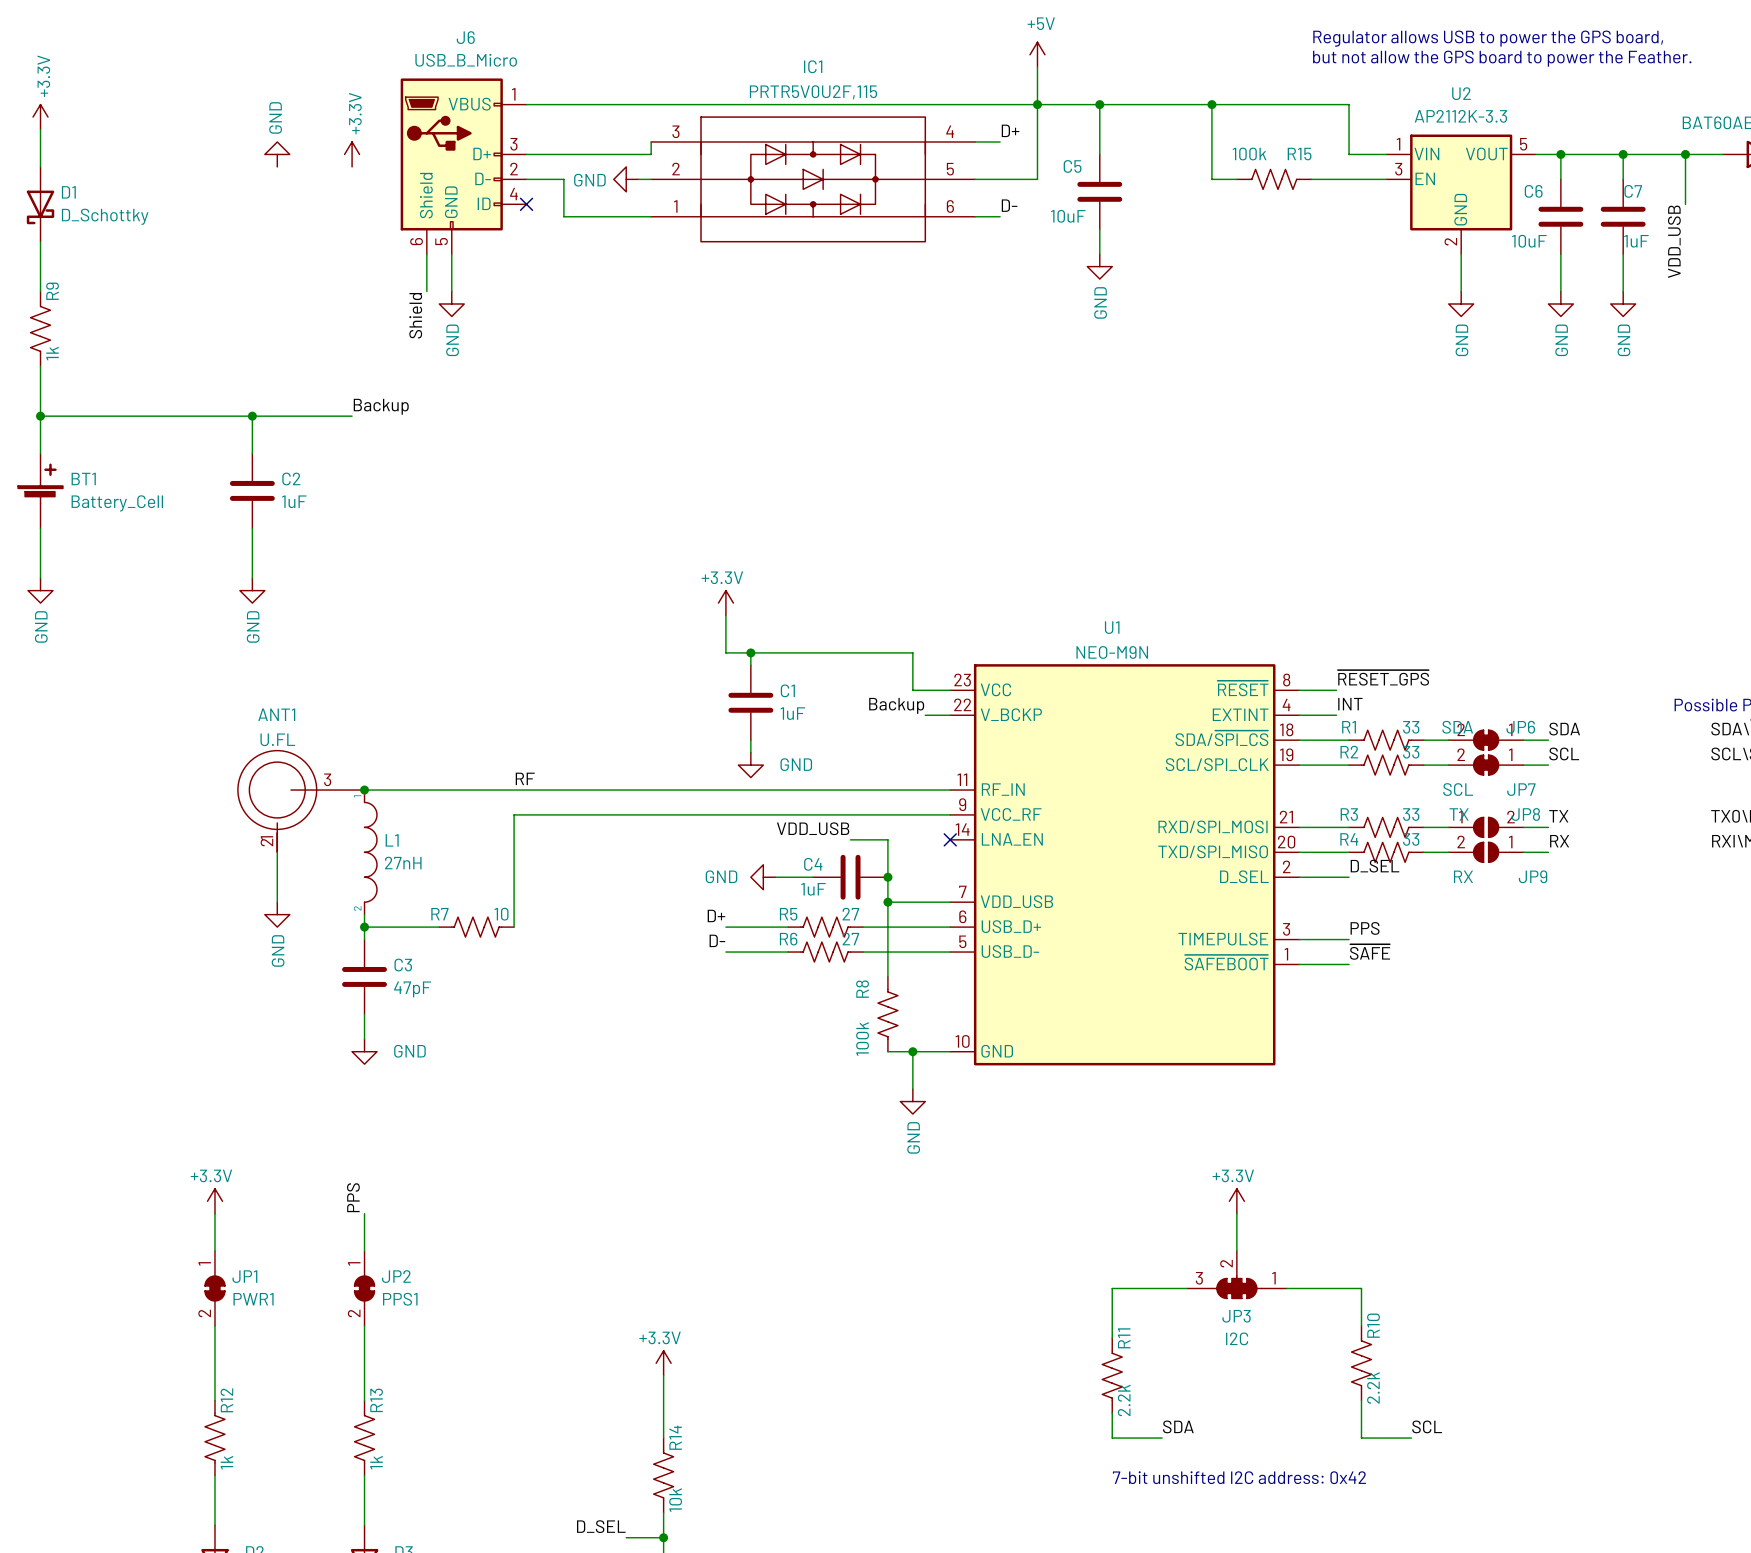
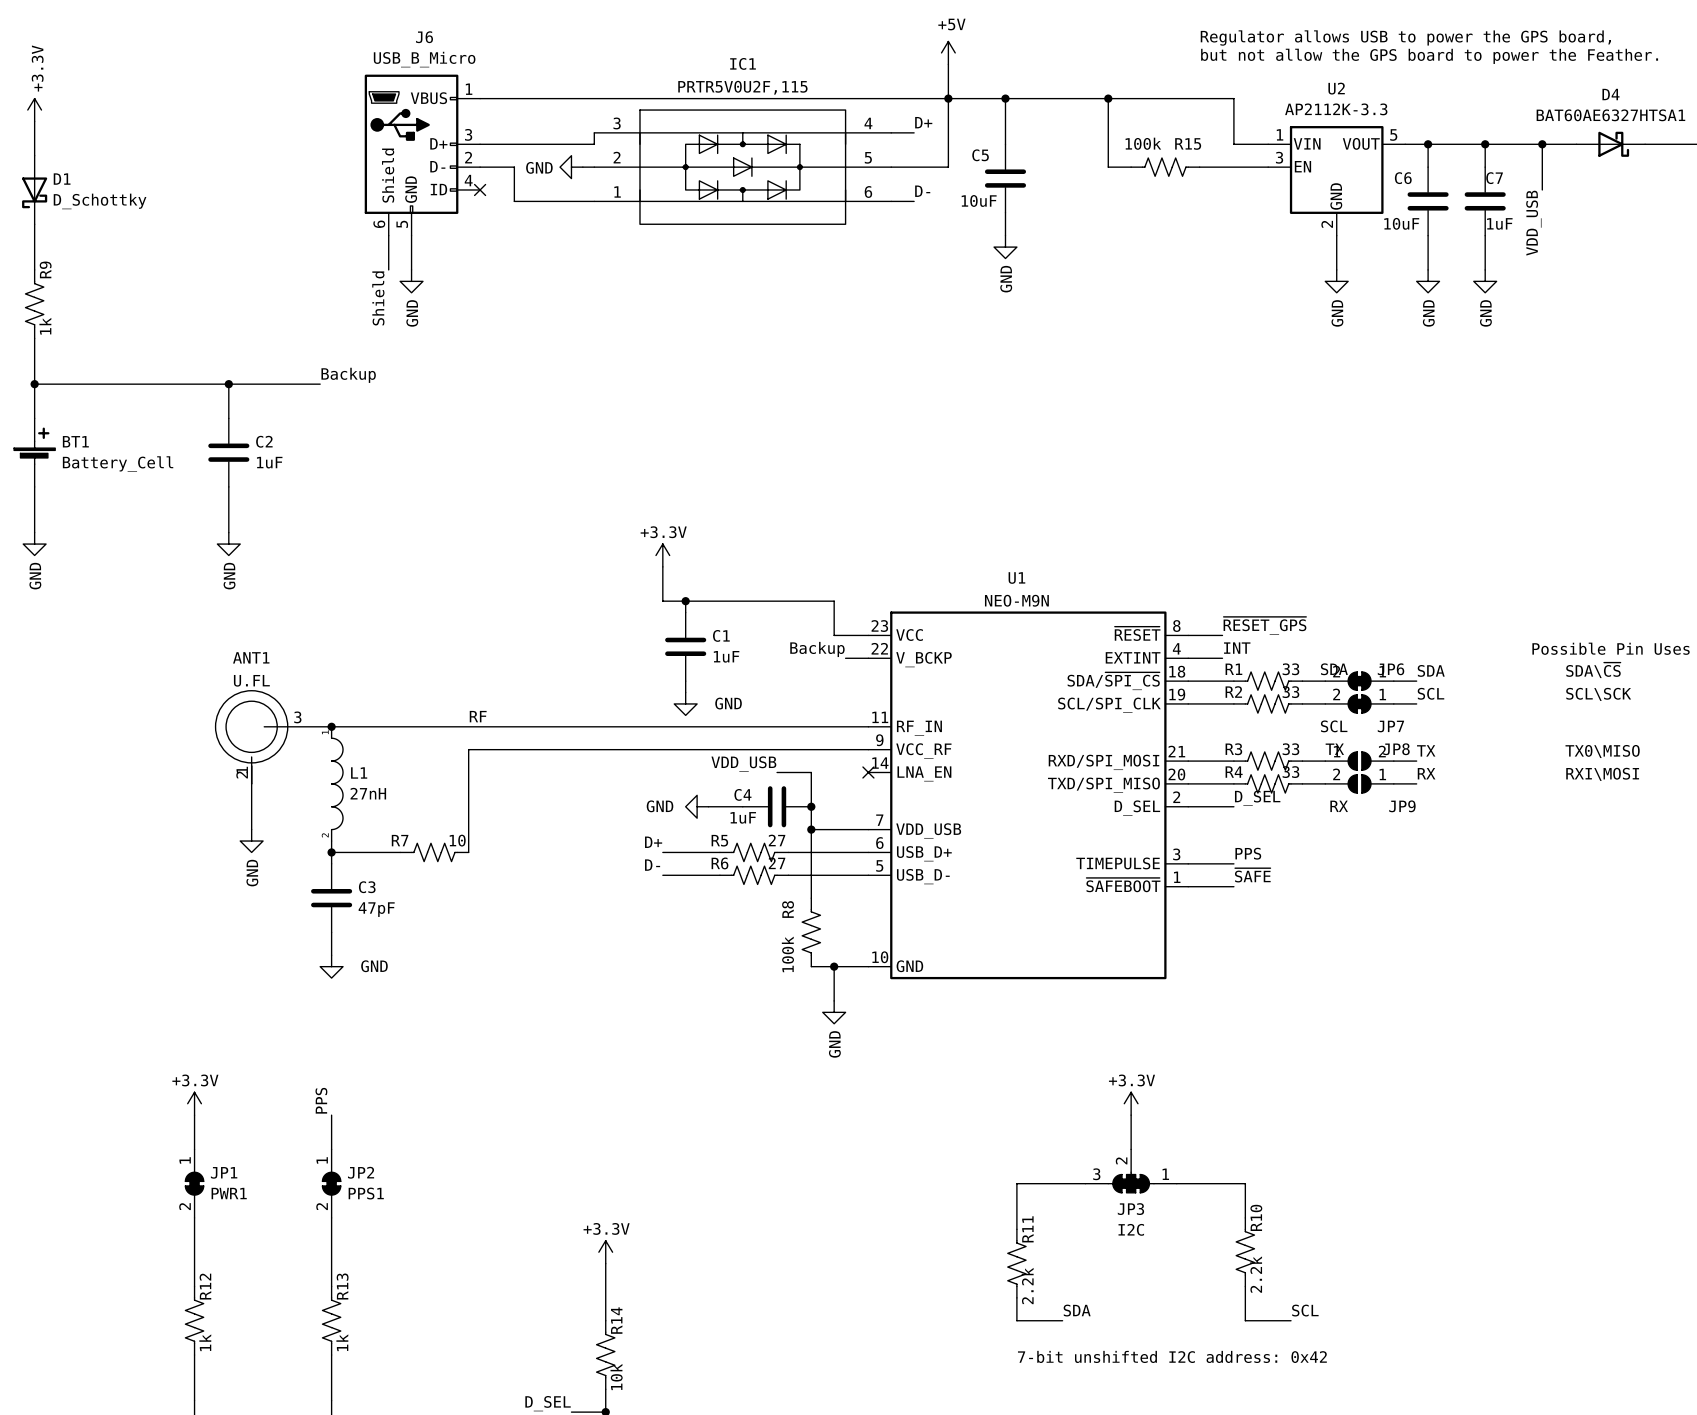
power symbol: GND (277, 154) -> none
power symbol: +3.3V (352, 154) -> none

